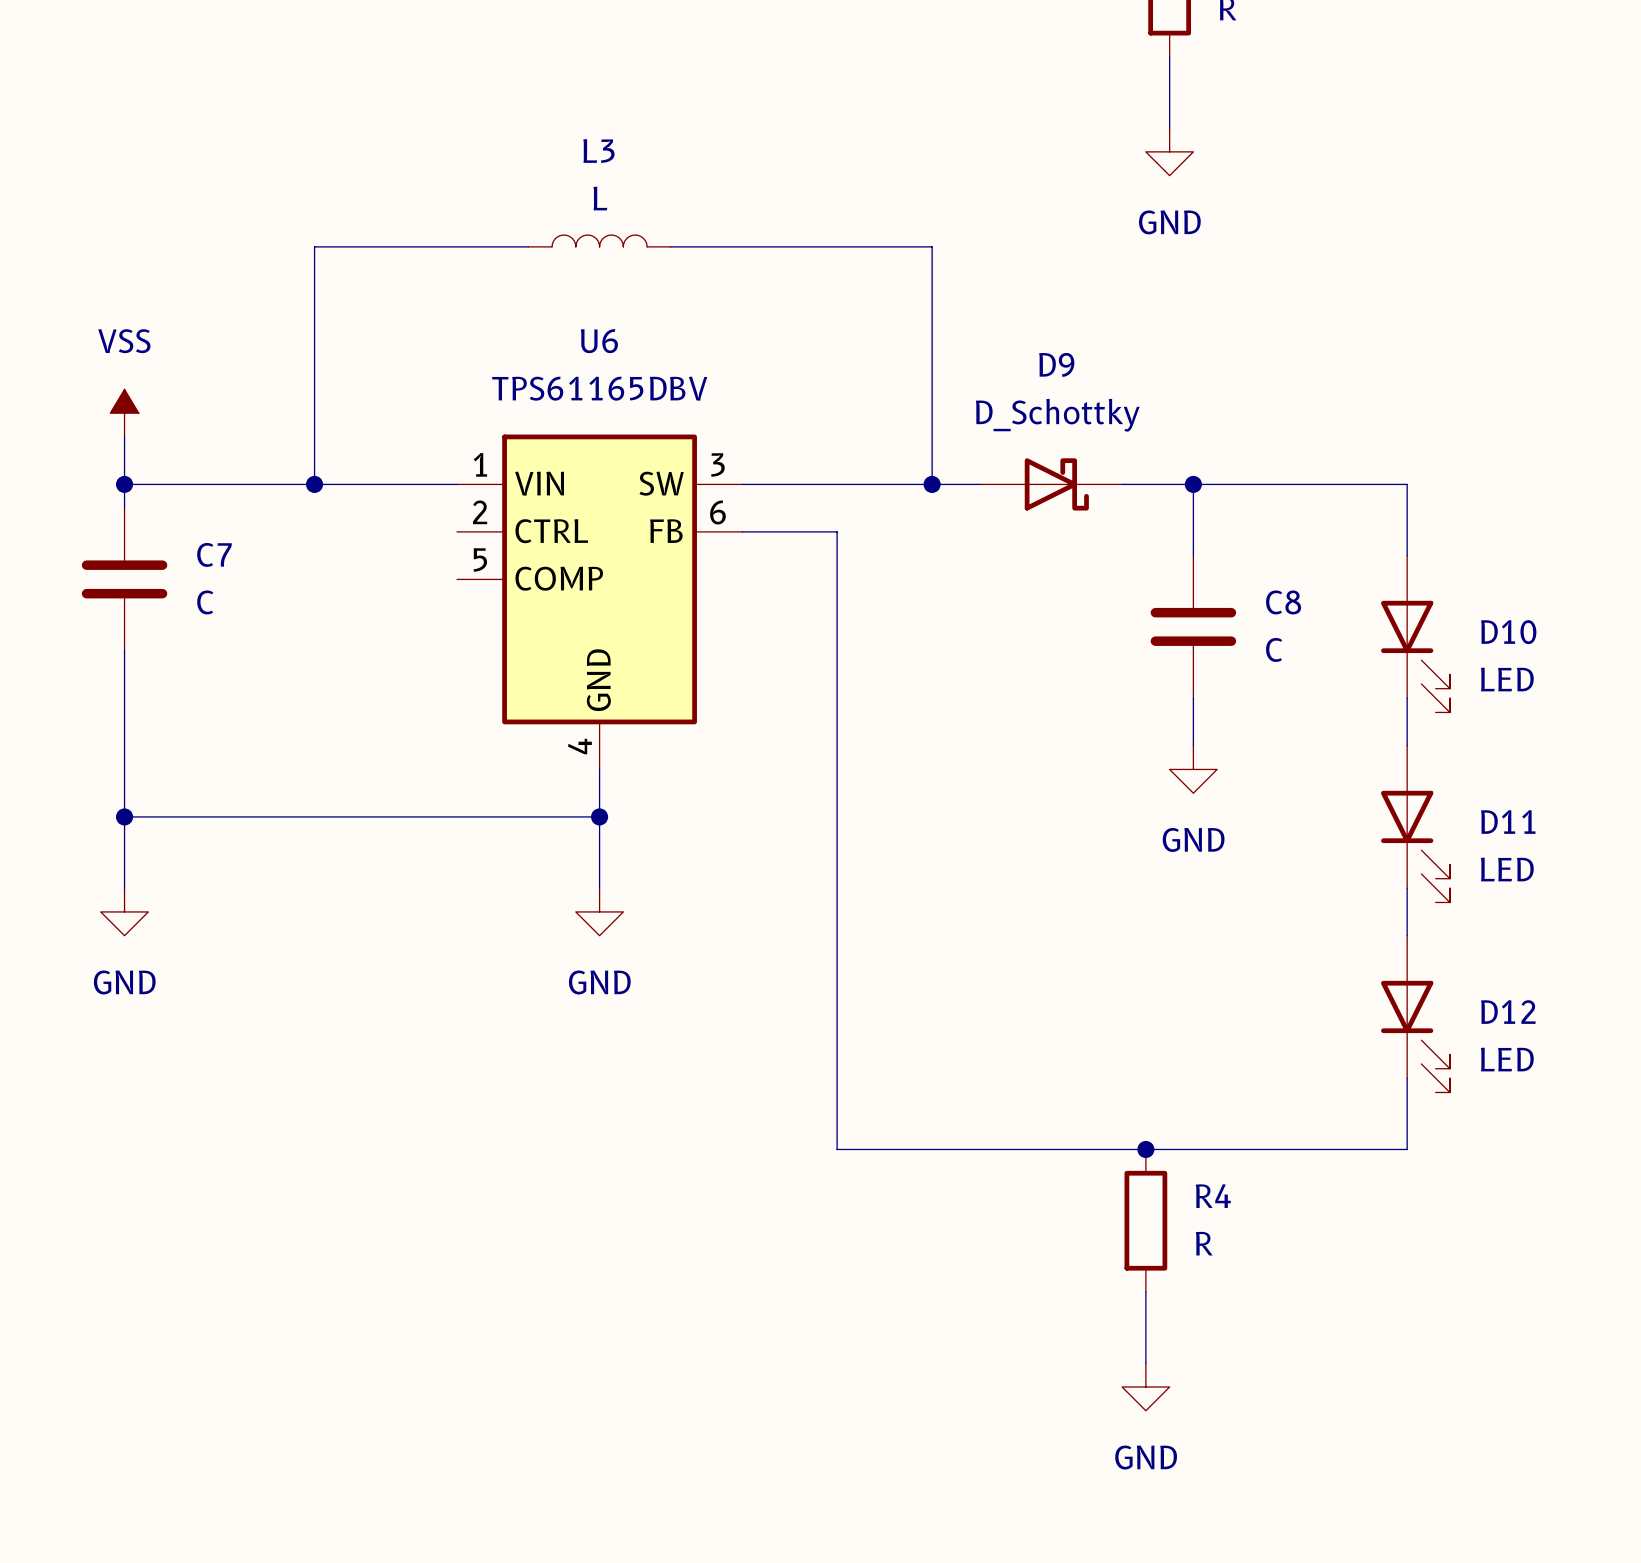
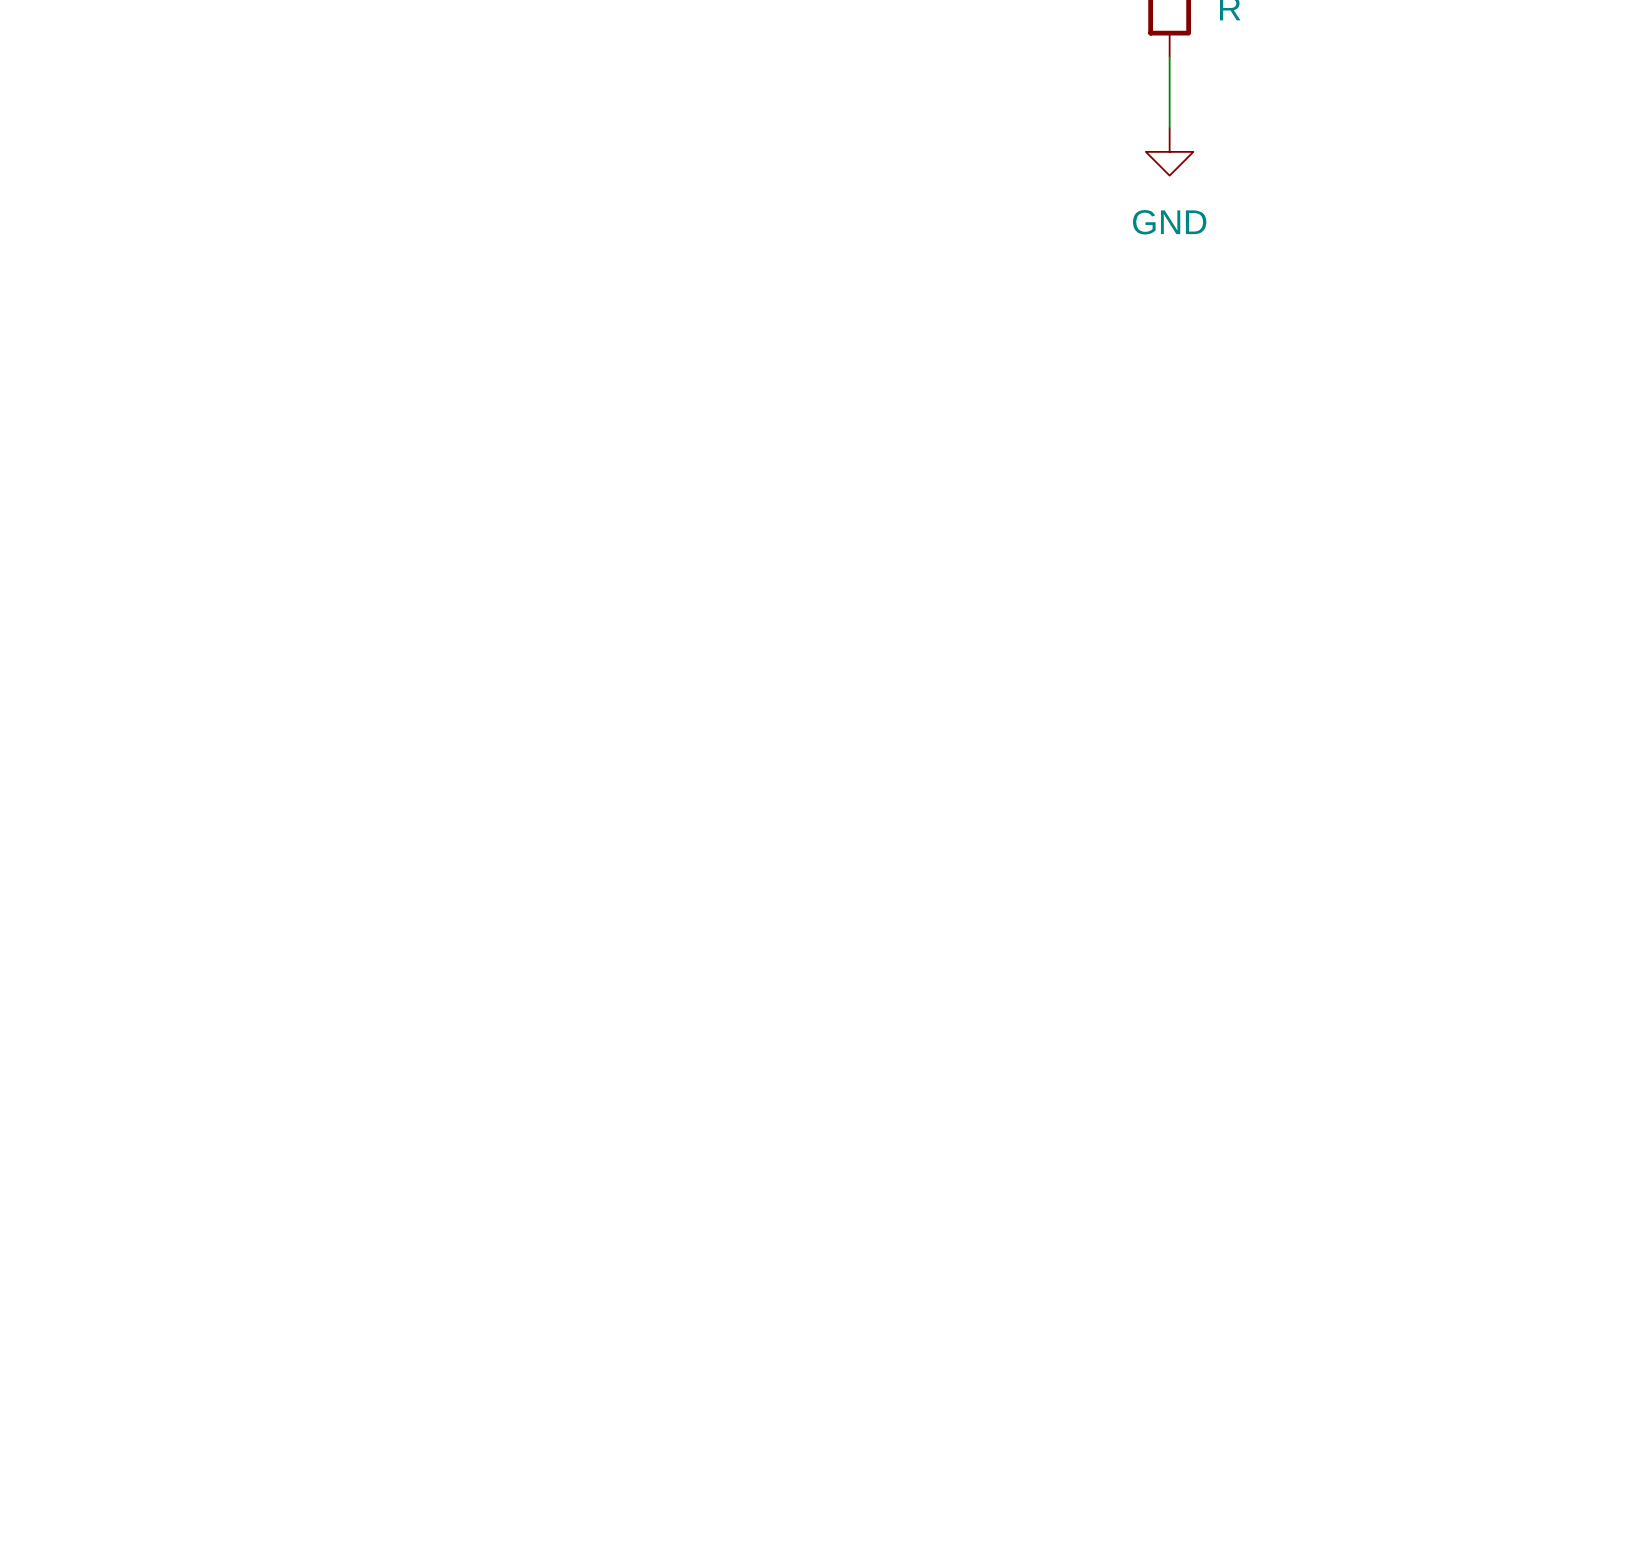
L3: L (599, 240) -> none
wire: (528, 246) (314, 246) (314, 484) -> none
wire: (670, 246) (932, 246) (932, 484) -> none
power symbol: VSS (124, 413) -> none
wire: (124, 436) (124, 508) -> none
wire: (124, 484) (457, 484) -> none
junction: (124, 484) -> none
junction: (314, 484) -> none
wire: (742, 484) (979, 484) -> none
junction: (932, 484) -> none
D9: D_Schottky (1050, 484) -> none
wire: (1122, 484) (1407, 484) (1407, 555) -> none
wire: (1193, 484) (1193, 555) -> none
junction: (1193, 484) -> none
wire: (742, 531) (837, 531) (837, 1149) (1407, 1149) (1407, 1078) -> none
C7: C (124, 579) -> none
U6: TPS61165DBV (599, 601) -> none
C8: C (1193, 626) -> none
D10: LED (1415, 634) -> none
wire: (124, 650) (124, 888) -> none
wire: (1193, 698) (1193, 745) -> none
wire: (1407, 698) (1407, 745) -> none
wire: (599, 769) (599, 888) -> none
power symbol: GND (1193, 769) -> none
wire: (124, 816) (599, 816) -> none
junction: (124, 816) -> none
junction: (599, 816) -> none
D11: LED (1415, 824) -> none
wire: (1407, 888) (1407, 935) -> none
power symbol: GND (124, 911) -> none
power symbol: GND (599, 911) -> none
D12: LED (1415, 1014) -> none
junction: (1145, 1149) -> none
R4: R (1145, 1220) -> none
wire: (1145, 1291) (1145, 1363) -> none
power symbol: GND (1145, 1387) -> none

